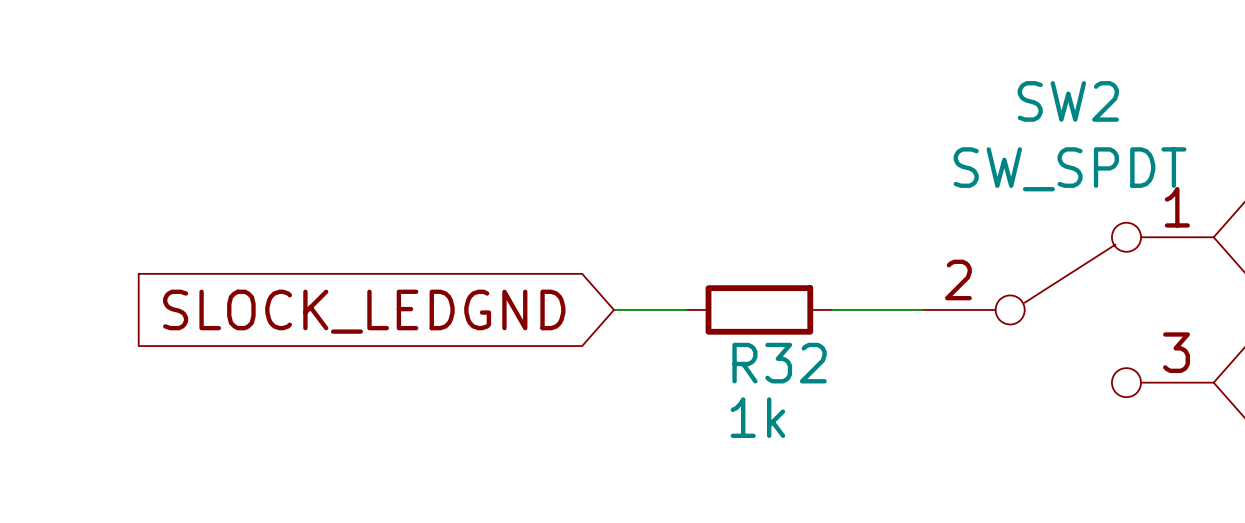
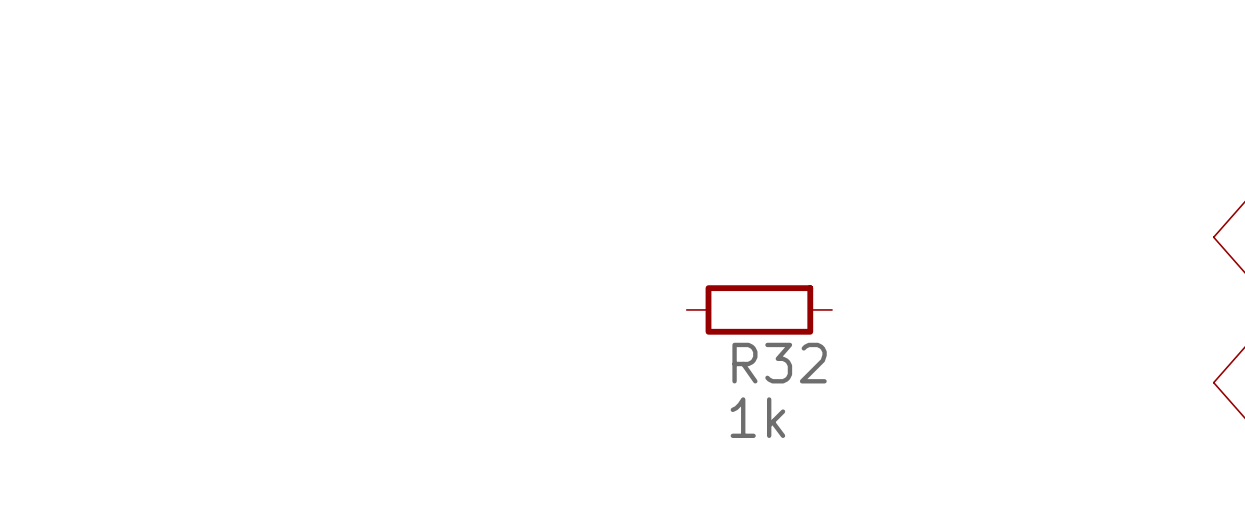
wire: (614, 309) (686, 309) -> none
wire: (832, 309) (922, 309) -> none
SW2: SW_SPDT (1068, 309) -> none
global label: SLOCK_LEDGND (364, 311) -> none

